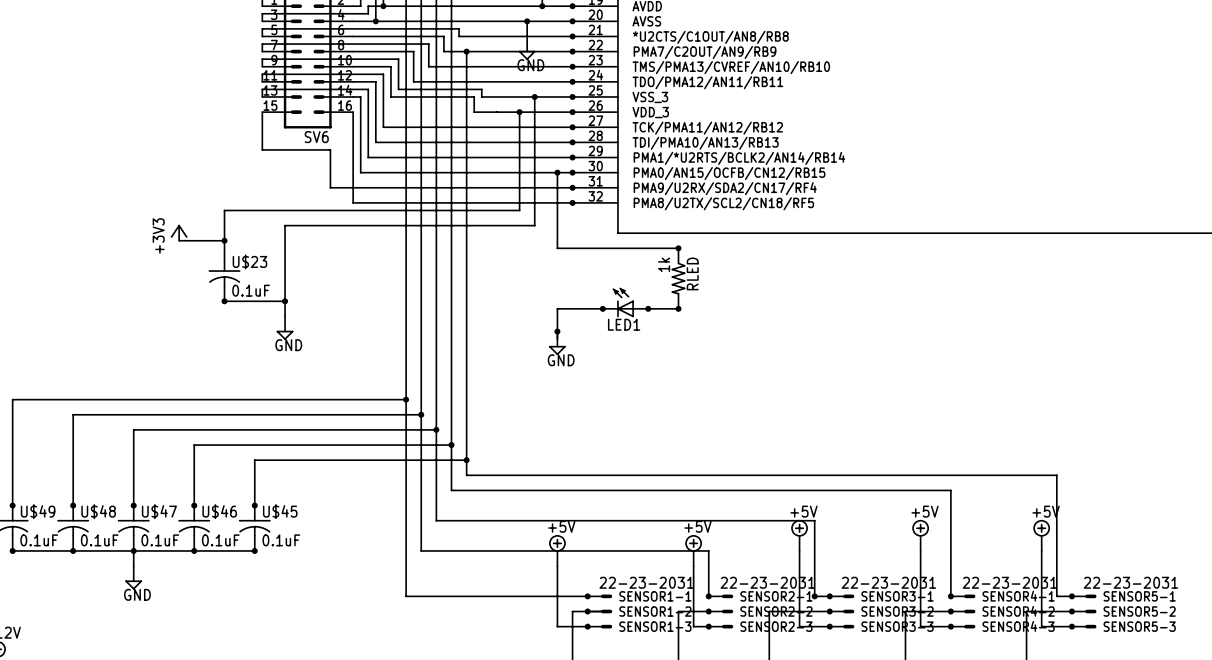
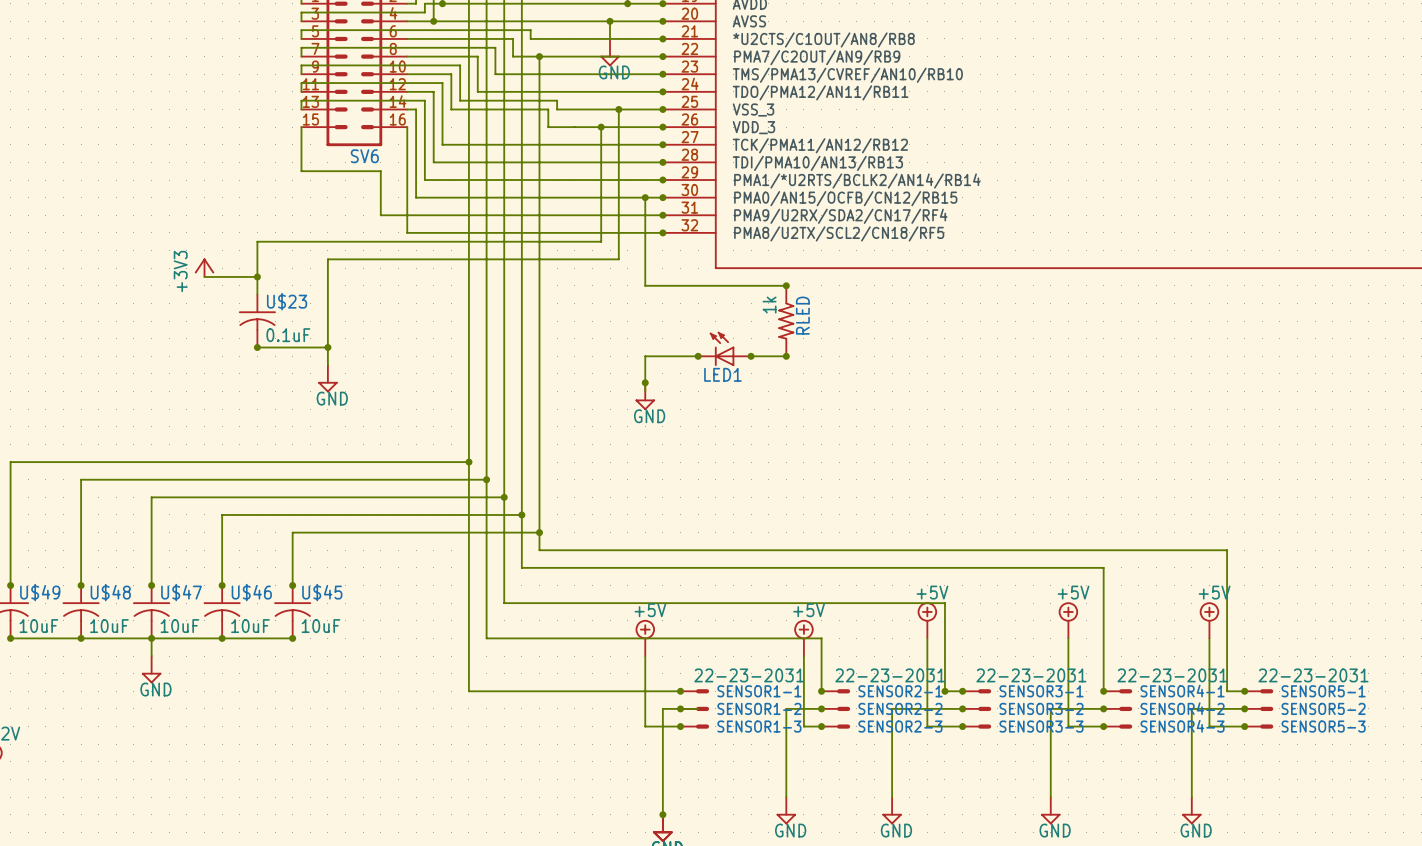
U$49 value: 0.1uF (39, 540) -> 10uF (38, 626)
U$48 value: 0.1uF (99, 540) -> 10uF (109, 626)
U$47 value: 0.1uF (160, 540) -> 10uF (179, 626)
U$46 value: 0.1uF (220, 540) -> 10uF (250, 626)
U$45 value: 0.1uF (281, 540) -> 10uF (320, 626)

